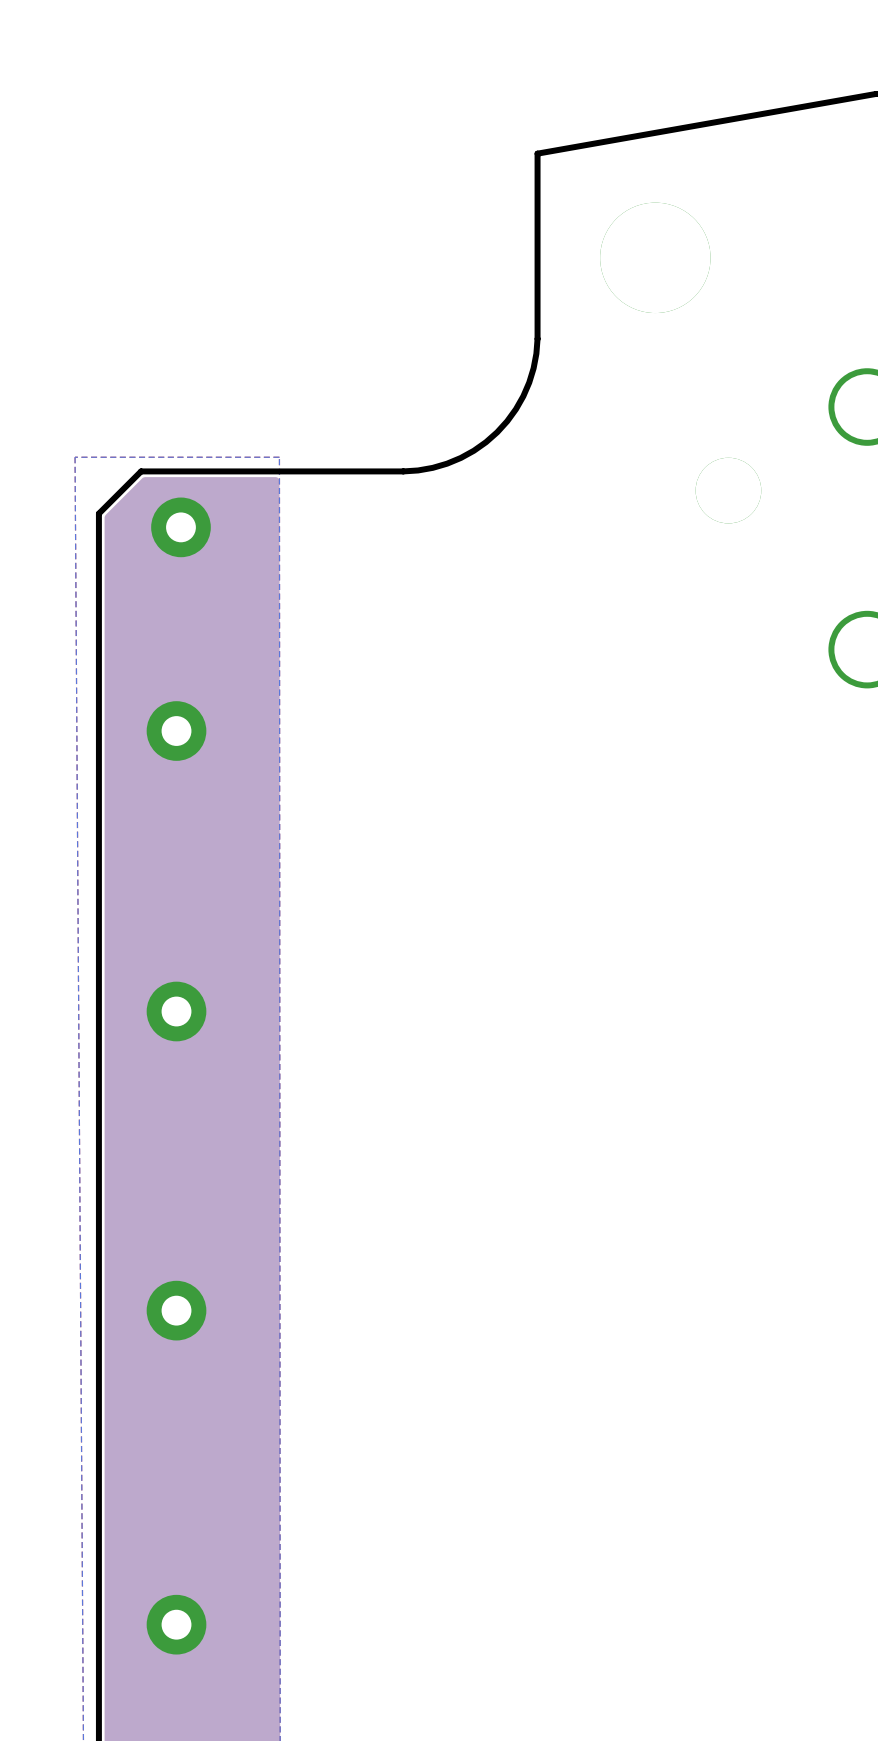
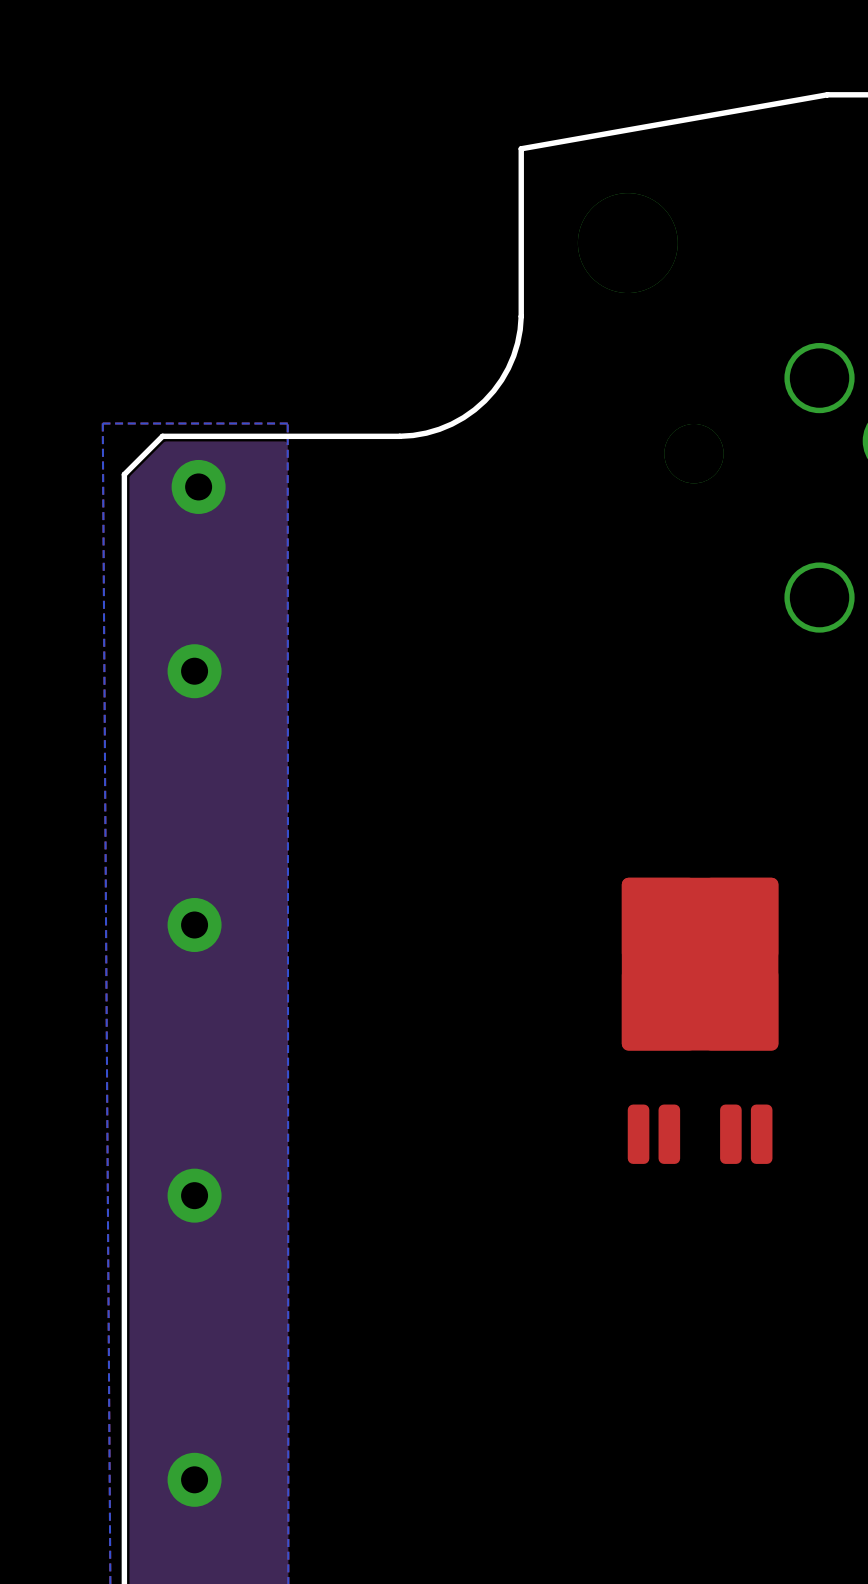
part: none -> (700, 1020)

